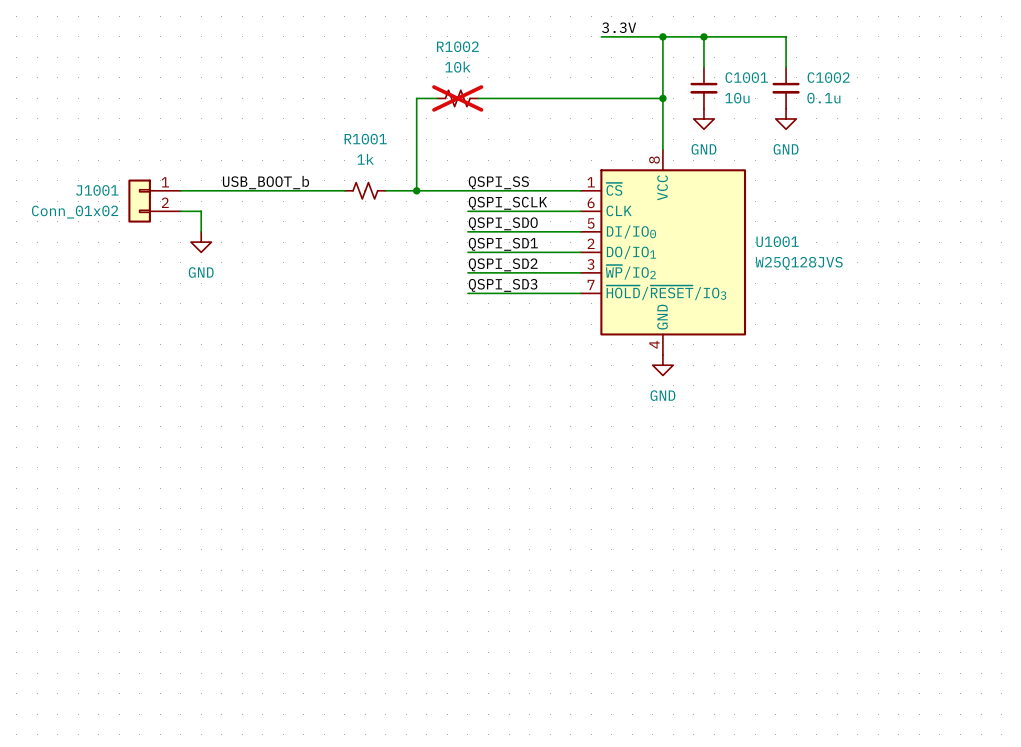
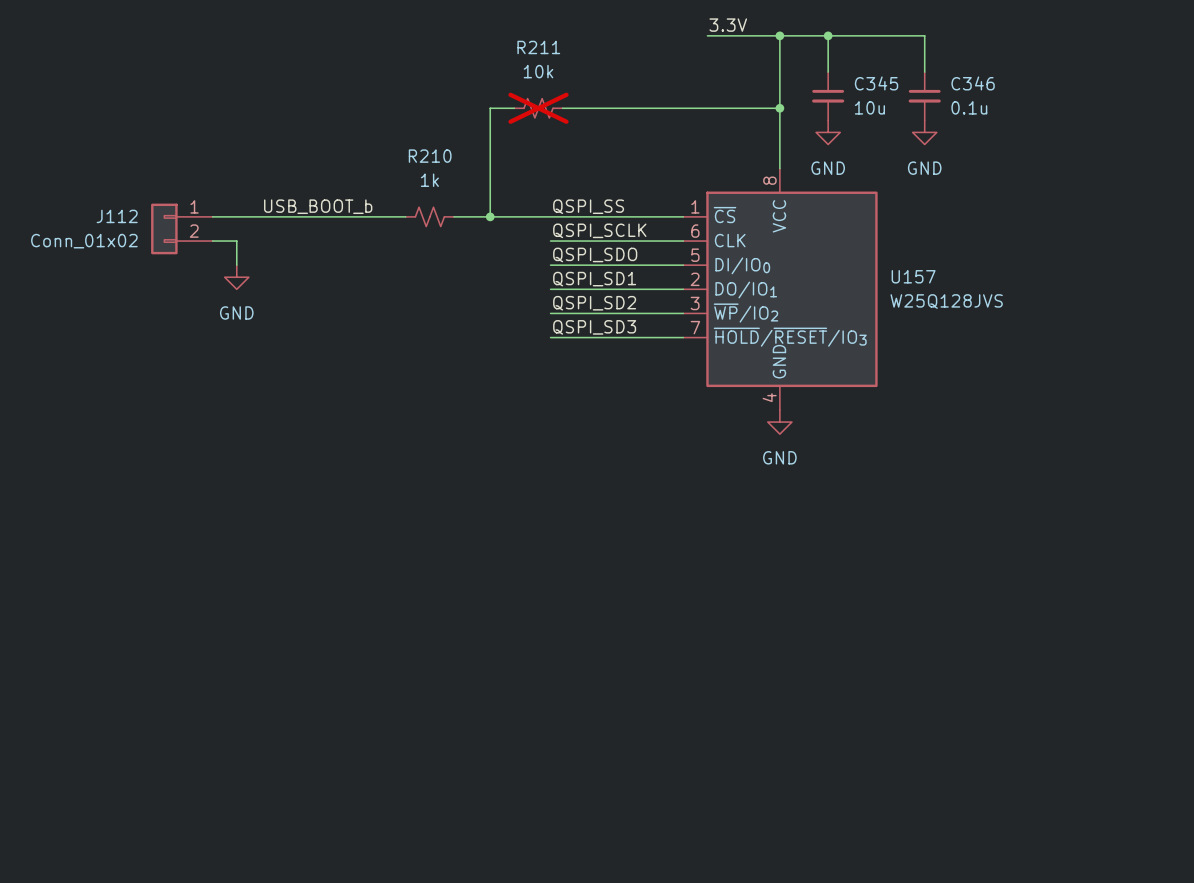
R1002 name: R1002 (457, 46) -> R211 (538, 47)
C1001 name: C1001 (746, 77) -> C345 (876, 83)
C1002 name: C1002 (828, 77) -> C346 (973, 83)
R1001 name: R1001 (365, 139) -> R210 (430, 156)
J1001 name: J1001 (97, 190) -> J112 (117, 216)
U1001 name: U1001 (777, 241) -> U157 (913, 276)

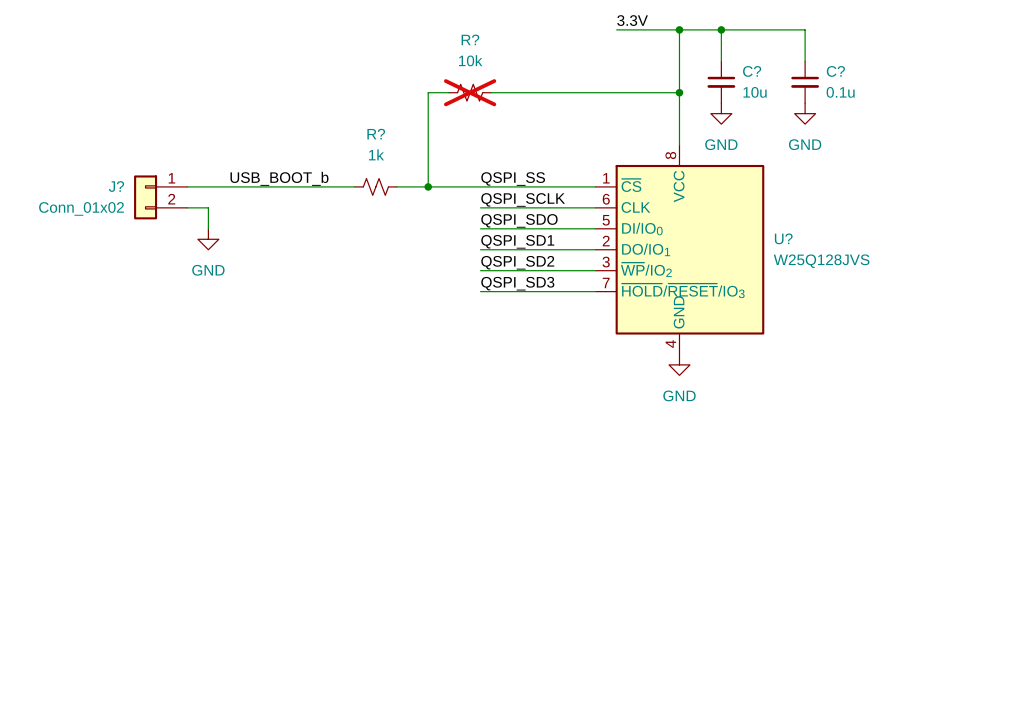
R211 name: R211 (538, 47) -> R? (470, 39)
C345 name: C345 (876, 83) -> C? (752, 71)
C346 name: C346 (973, 83) -> C? (835, 71)
R210 name: R210 (430, 156) -> R? (376, 134)
J112 name: J112 (117, 216) -> J? (116, 186)
U157 name: U157 (913, 276) -> U? (783, 238)

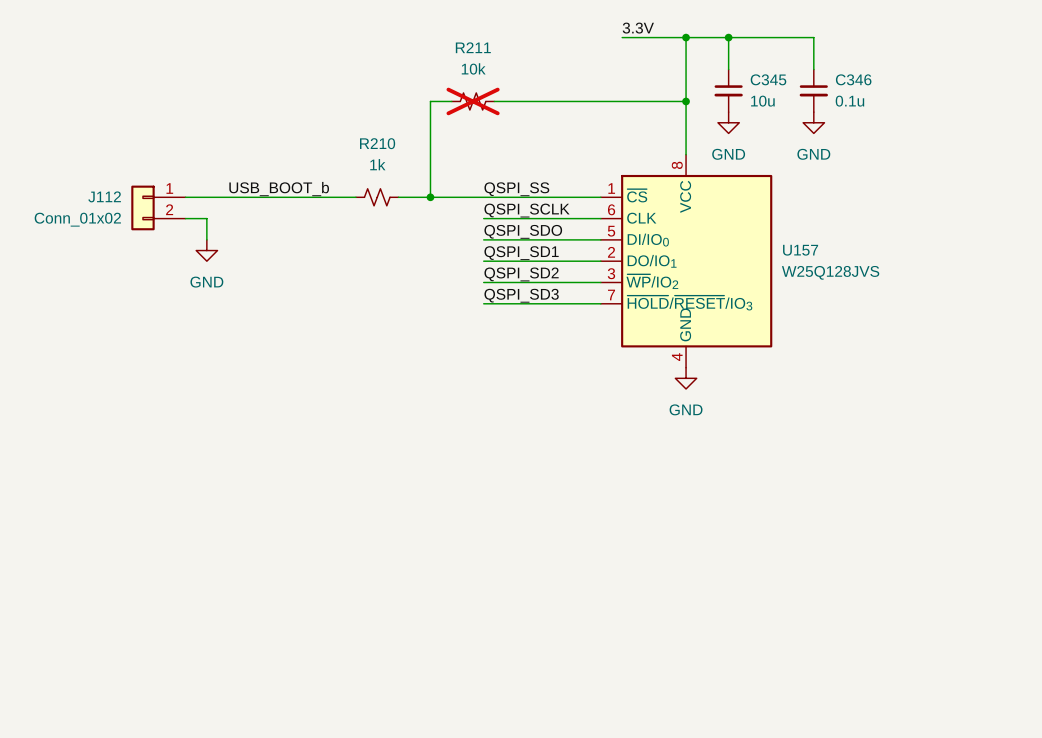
R? name: R? (470, 39) -> R211 (473, 47)
C? name: C? (752, 71) -> C345 (768, 79)
C? name: C? (835, 71) -> C346 (853, 79)
R? name: R? (376, 134) -> R210 (377, 143)
J? name: J? (116, 186) -> J112 (104, 196)
U? name: U? (783, 238) -> U157 (800, 250)

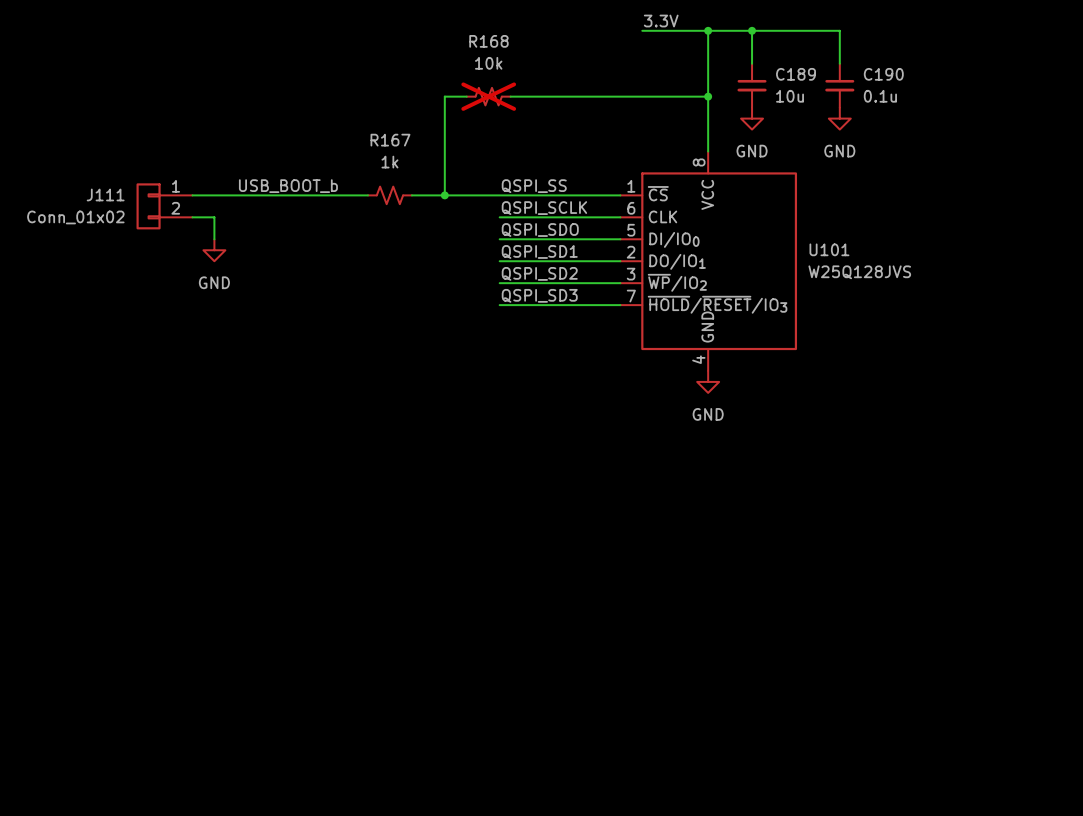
R211 name: R211 (473, 47) -> R168 (488, 41)
C345 name: C345 (768, 79) -> C189 (796, 74)
C346 name: C346 (853, 79) -> C190 (883, 74)
R210 name: R210 (377, 143) -> R167 (390, 140)
J112 name: J112 (104, 196) -> J111 (105, 194)
U157 name: U157 (800, 250) -> U101 (829, 249)

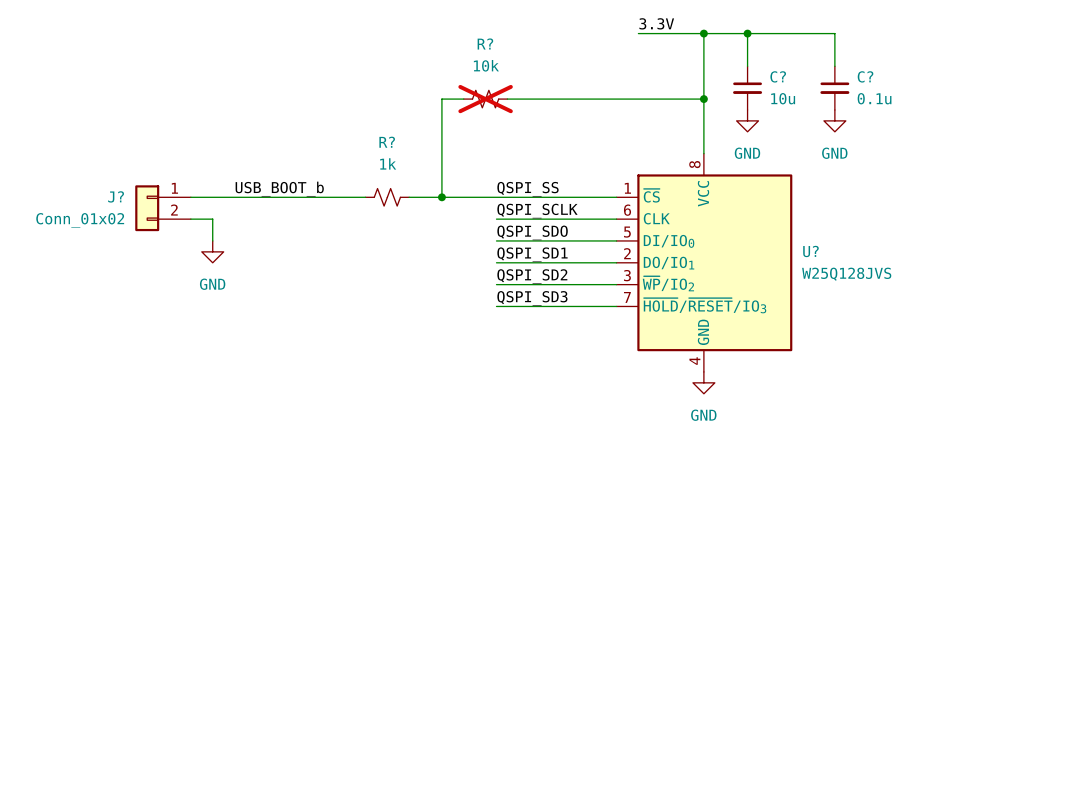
R168 name: R168 (488, 41) -> R? (485, 43)
C189 name: C189 (796, 74) -> C? (778, 76)
C190 name: C190 (883, 74) -> C? (865, 76)
R167 name: R167 (390, 140) -> R? (387, 142)
J111 name: J111 (105, 194) -> J? (116, 196)
U101 name: U101 (829, 249) -> U? (810, 251)

